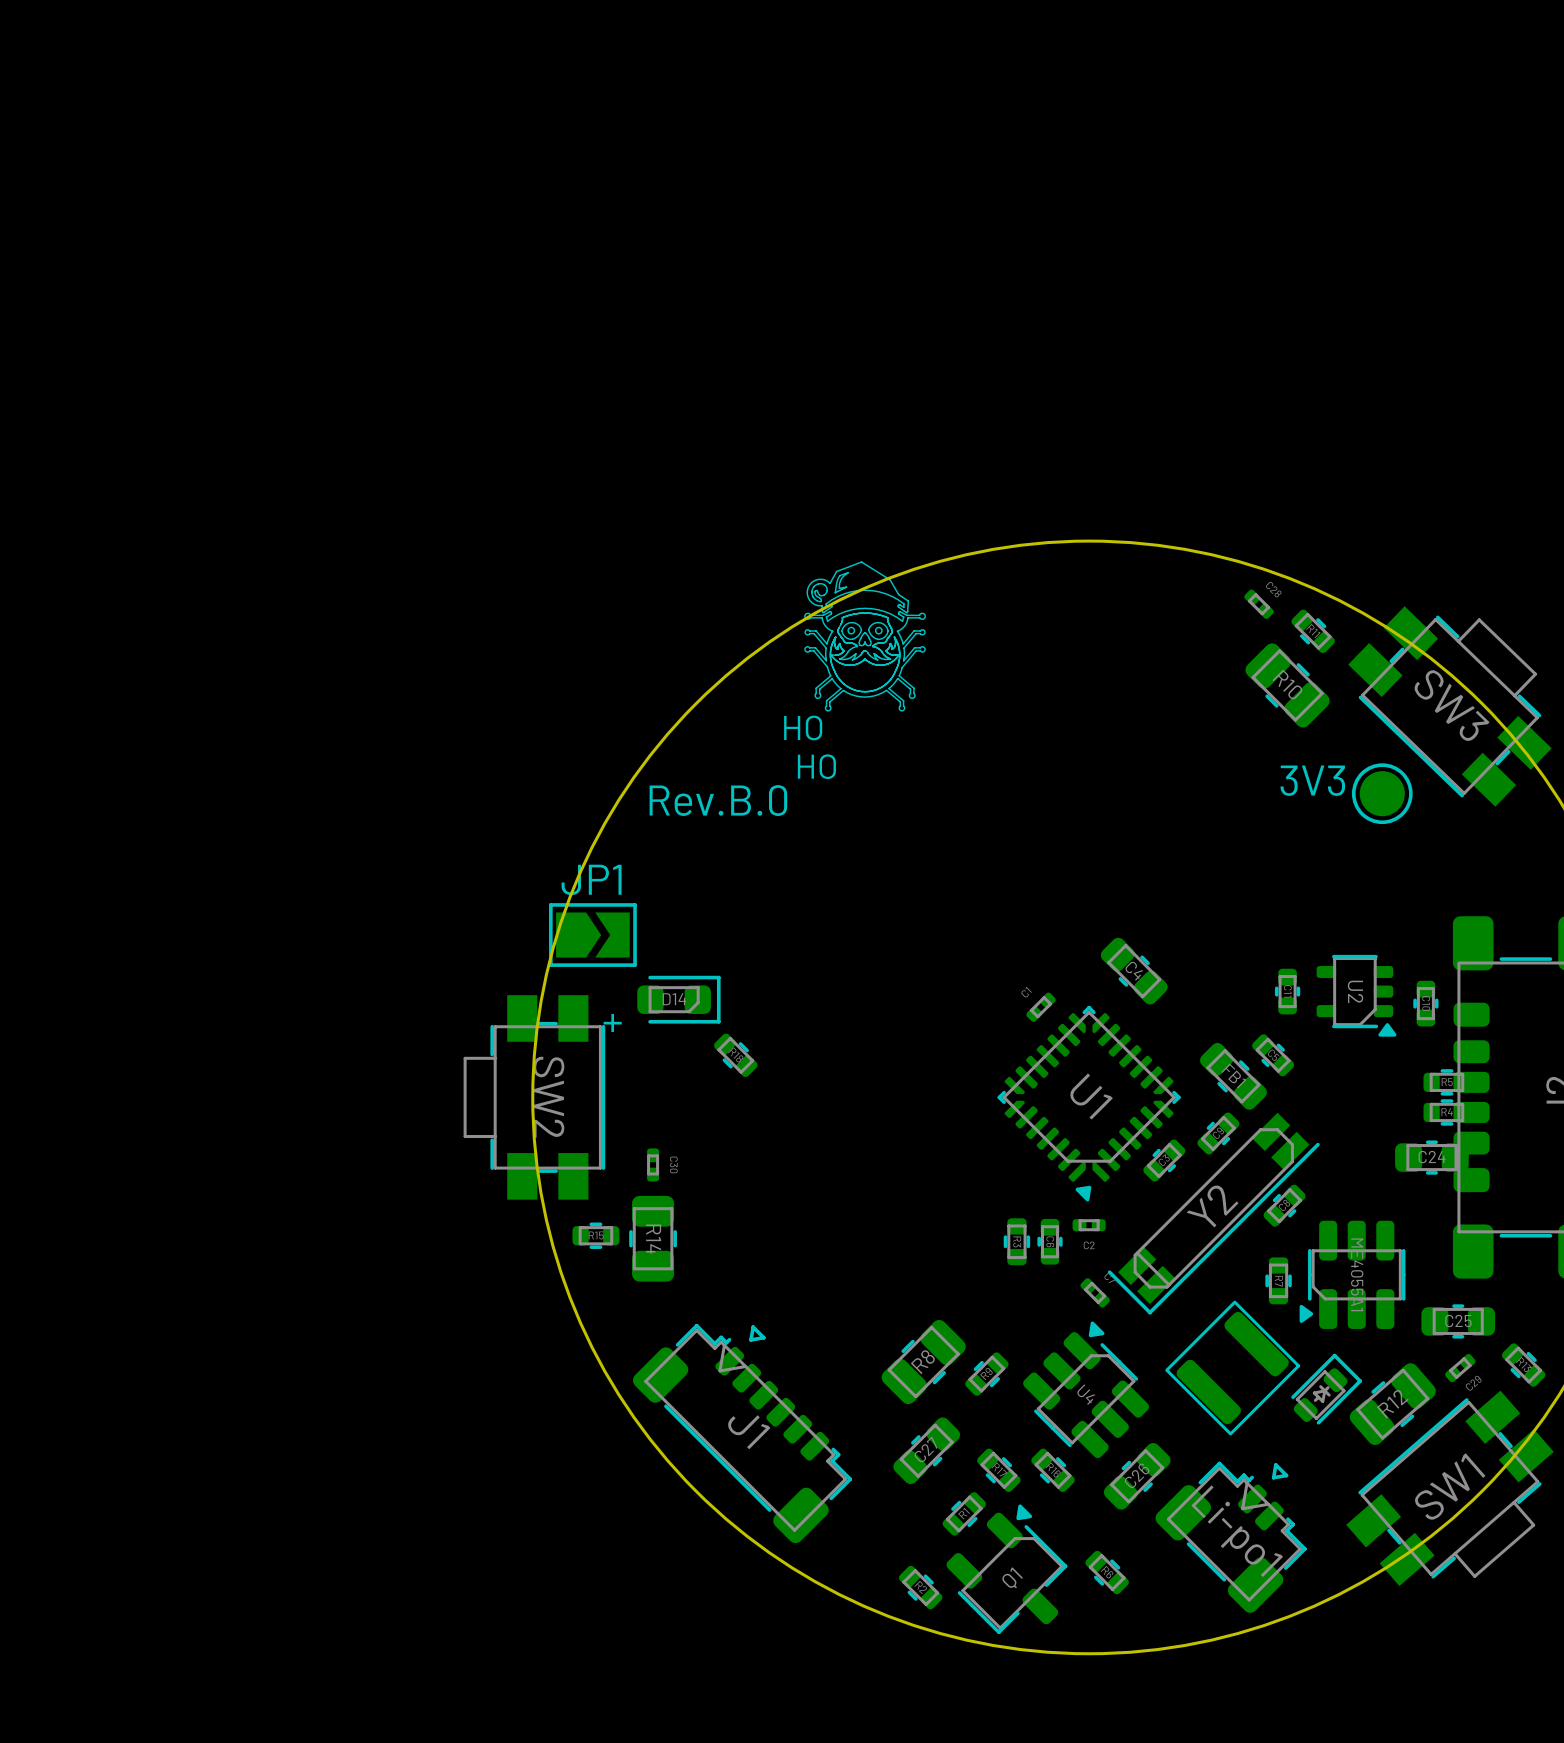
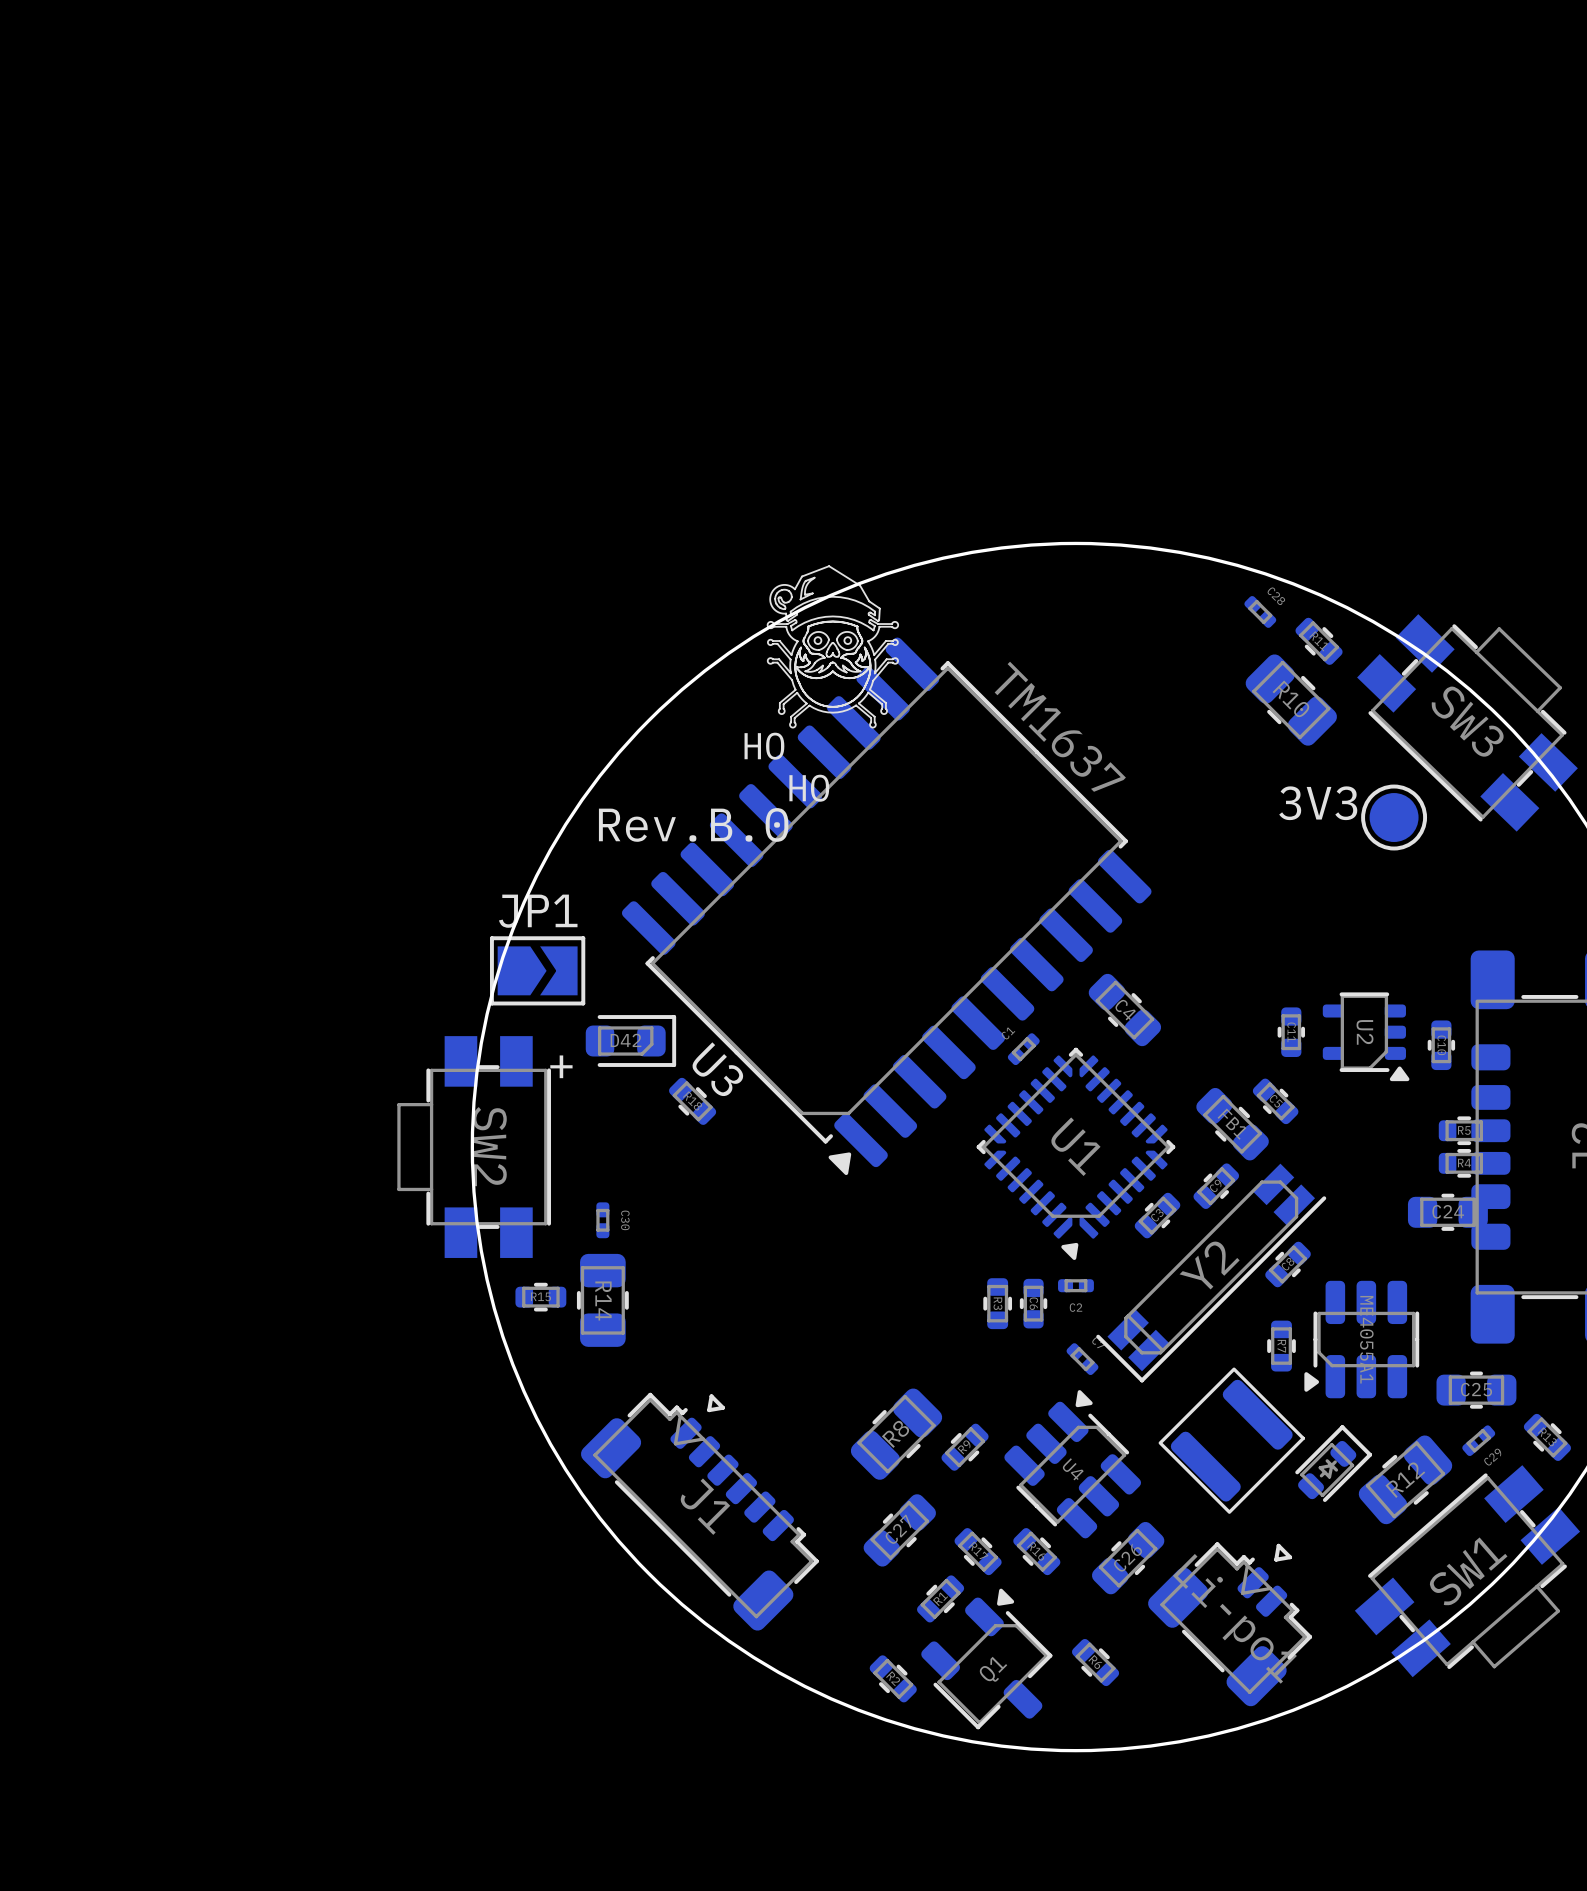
U3: none -> TM1637 (886, 906)
D14 name: D14 (674, 999) -> D42 (626, 1040)

